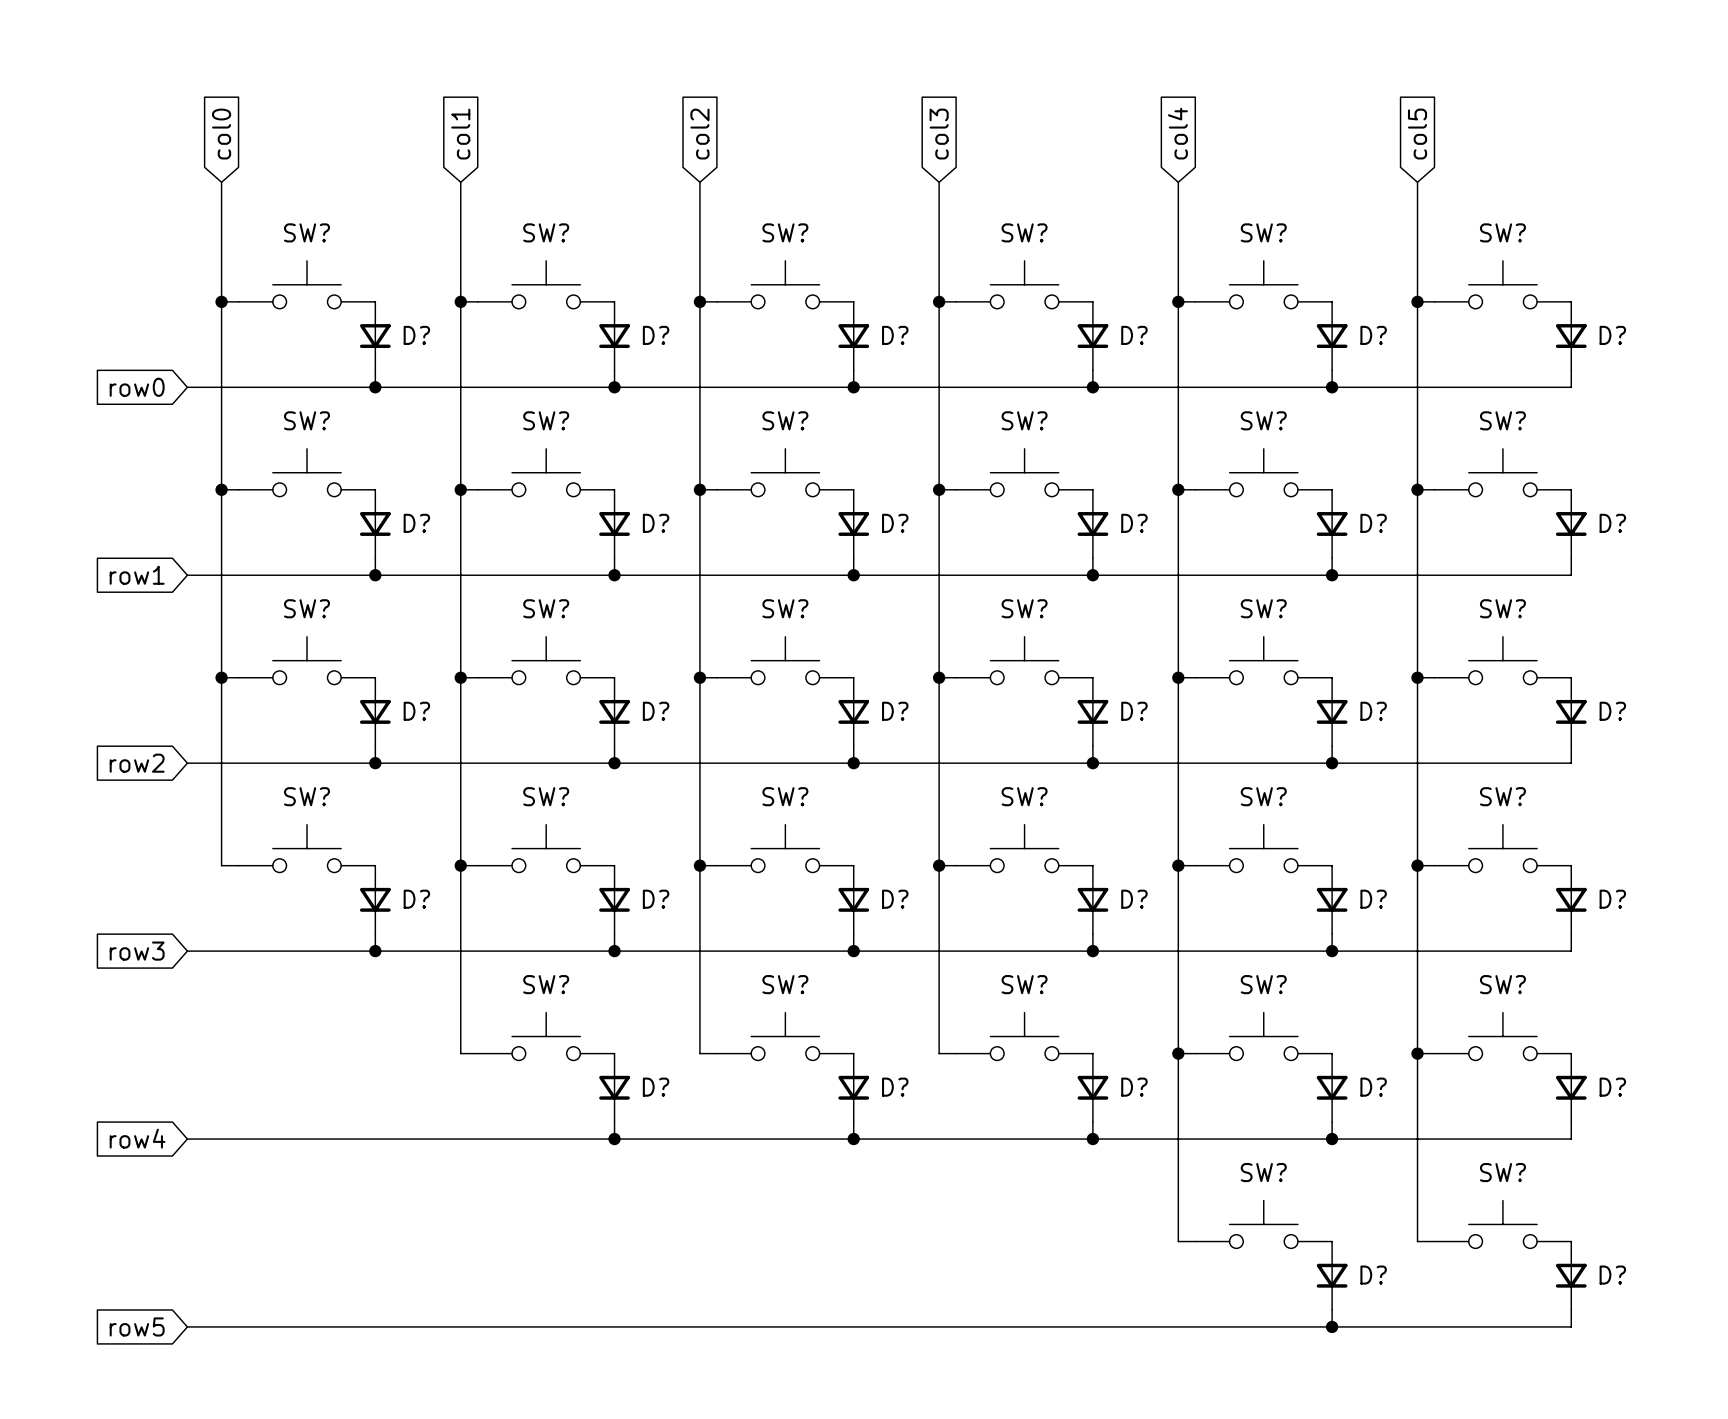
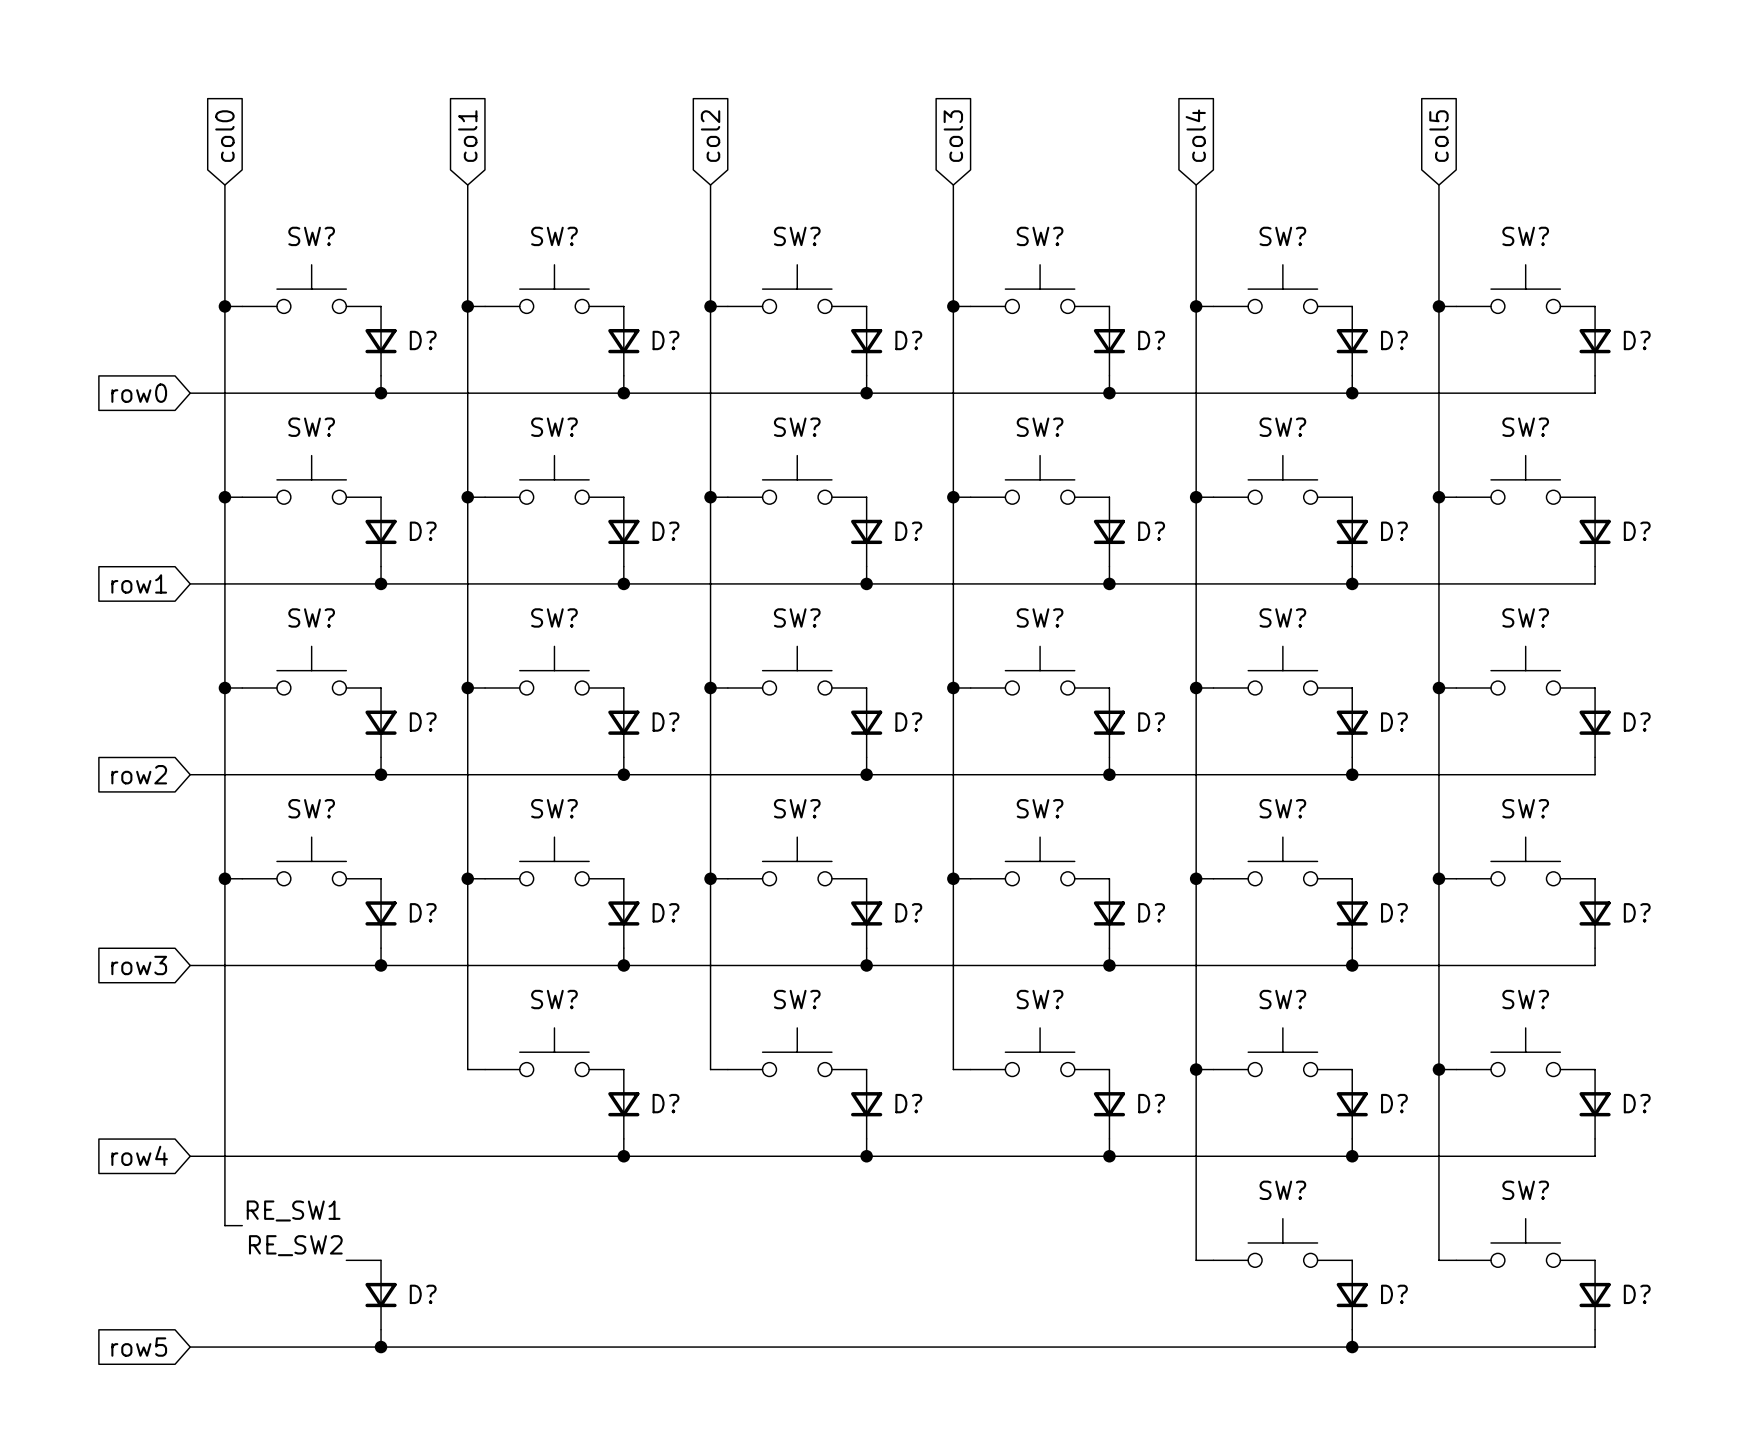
wire: none -> (224, 878) (224, 1225) (242, 1225)
junction: none -> (224, 878)
label: none -> RE_SW1 (293, 1210)
label: none -> RE_SW2 (295, 1245)
wire: none -> (346, 1260) (381, 1260)
D?: none -> (381, 1295)
wire: none -> (381, 1329) (381, 1347)
junction: none -> (381, 1347)

